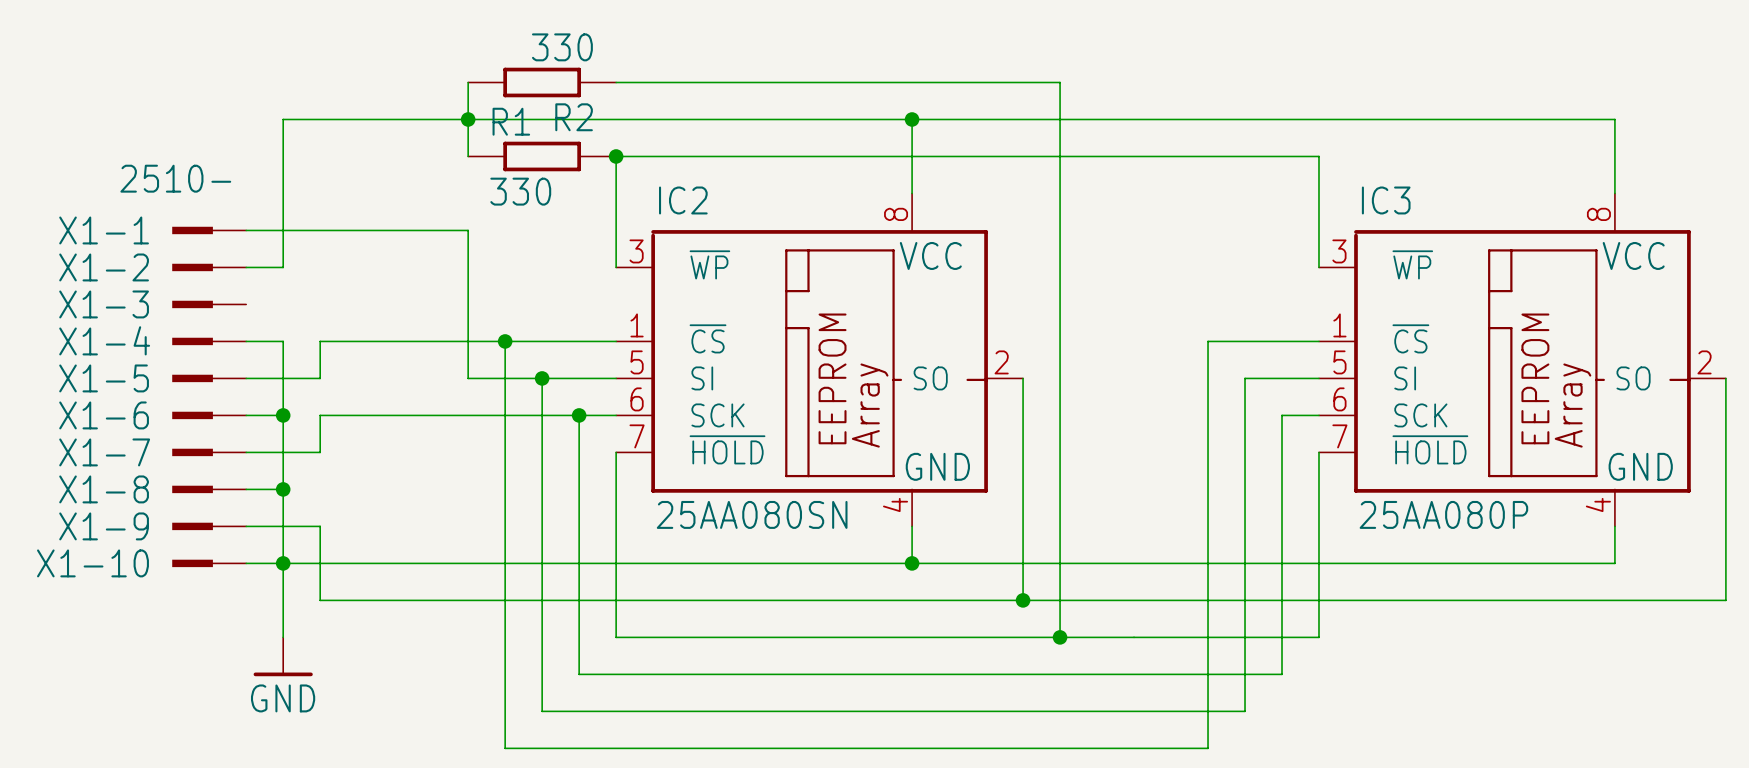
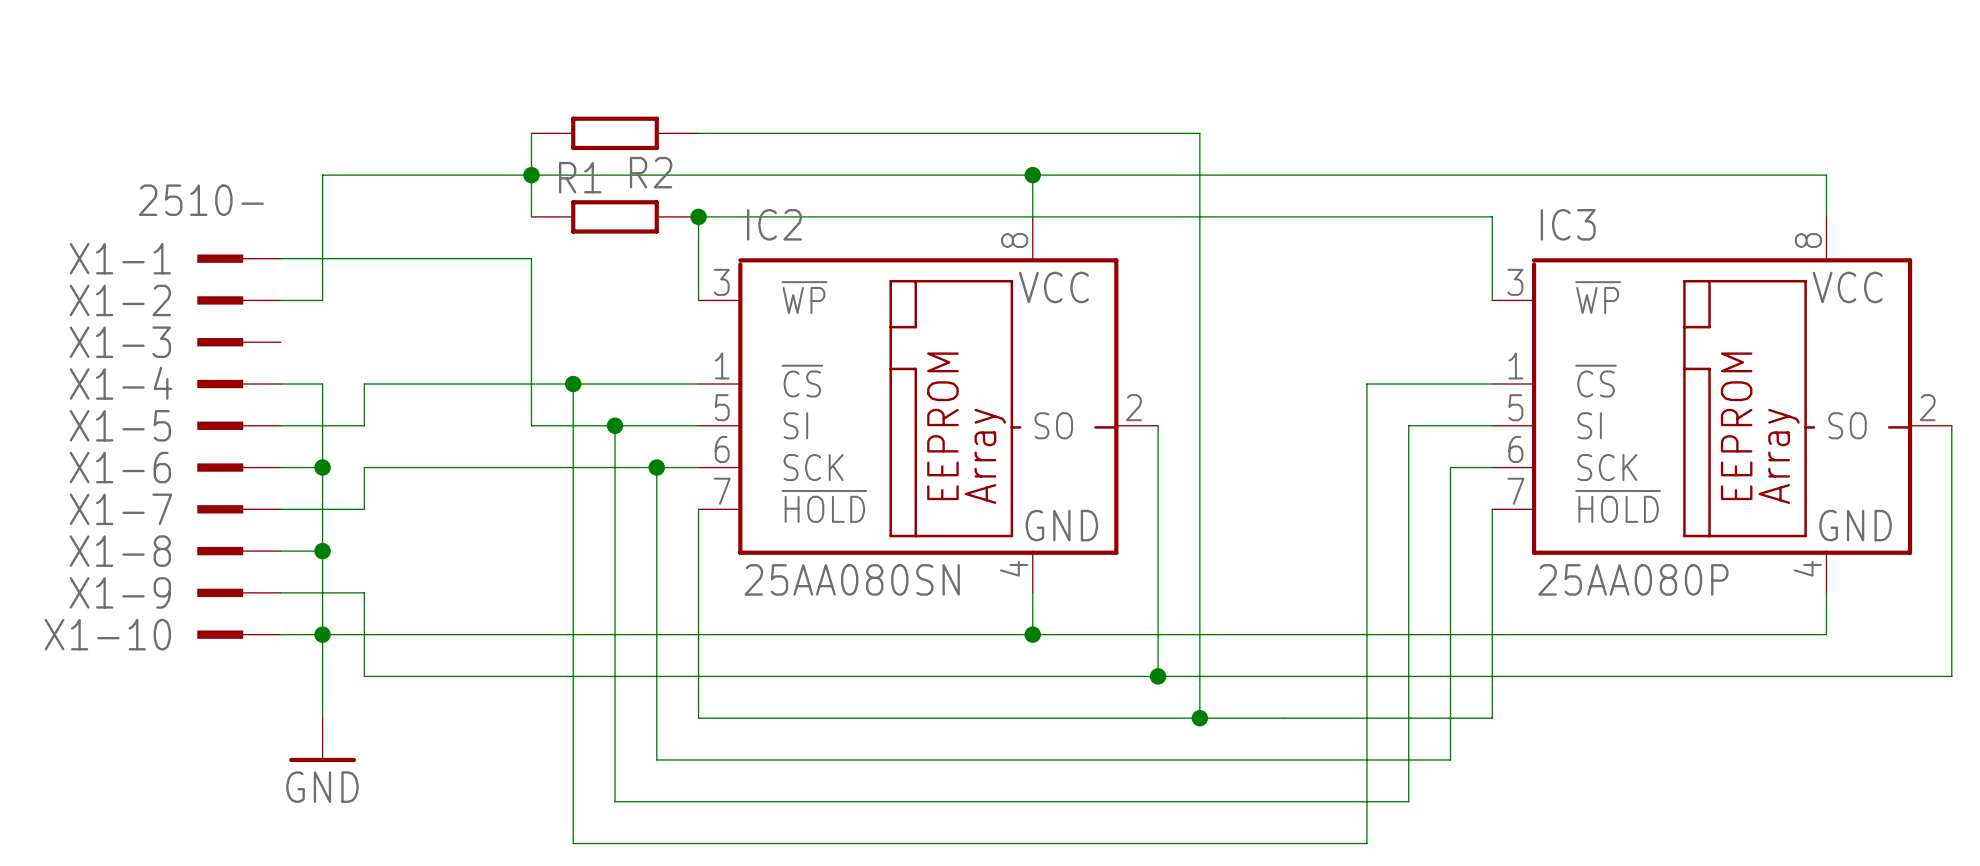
R2 value: 330 (562, 47) -> none
wire: (468, 82) (468, 119) -> (531, 175) (531, 216)
R2 position: (542, 82) -> (615, 133)
wire: (616, 82) (1060, 82) (1060, 119) (1614, 119) (1614, 156) -> none
junction position: (468, 119) -> (531, 175)
wire: (616, 119) (283, 119) (283, 156) -> (698, 175) (322, 175)
wire: (912, 119) (912, 156) -> none
junction position: (912, 119) -> (1032, 175)
R1 position: (542, 156) -> (615, 216)
wire: (616, 156) (616, 193) -> (1492, 216) (698, 216)
junction position: (616, 156) -> (698, 216)
wire: (1318, 156) (1318, 193) -> (1492, 175) (1826, 175)
R1 value: 330 (520, 191) -> none

